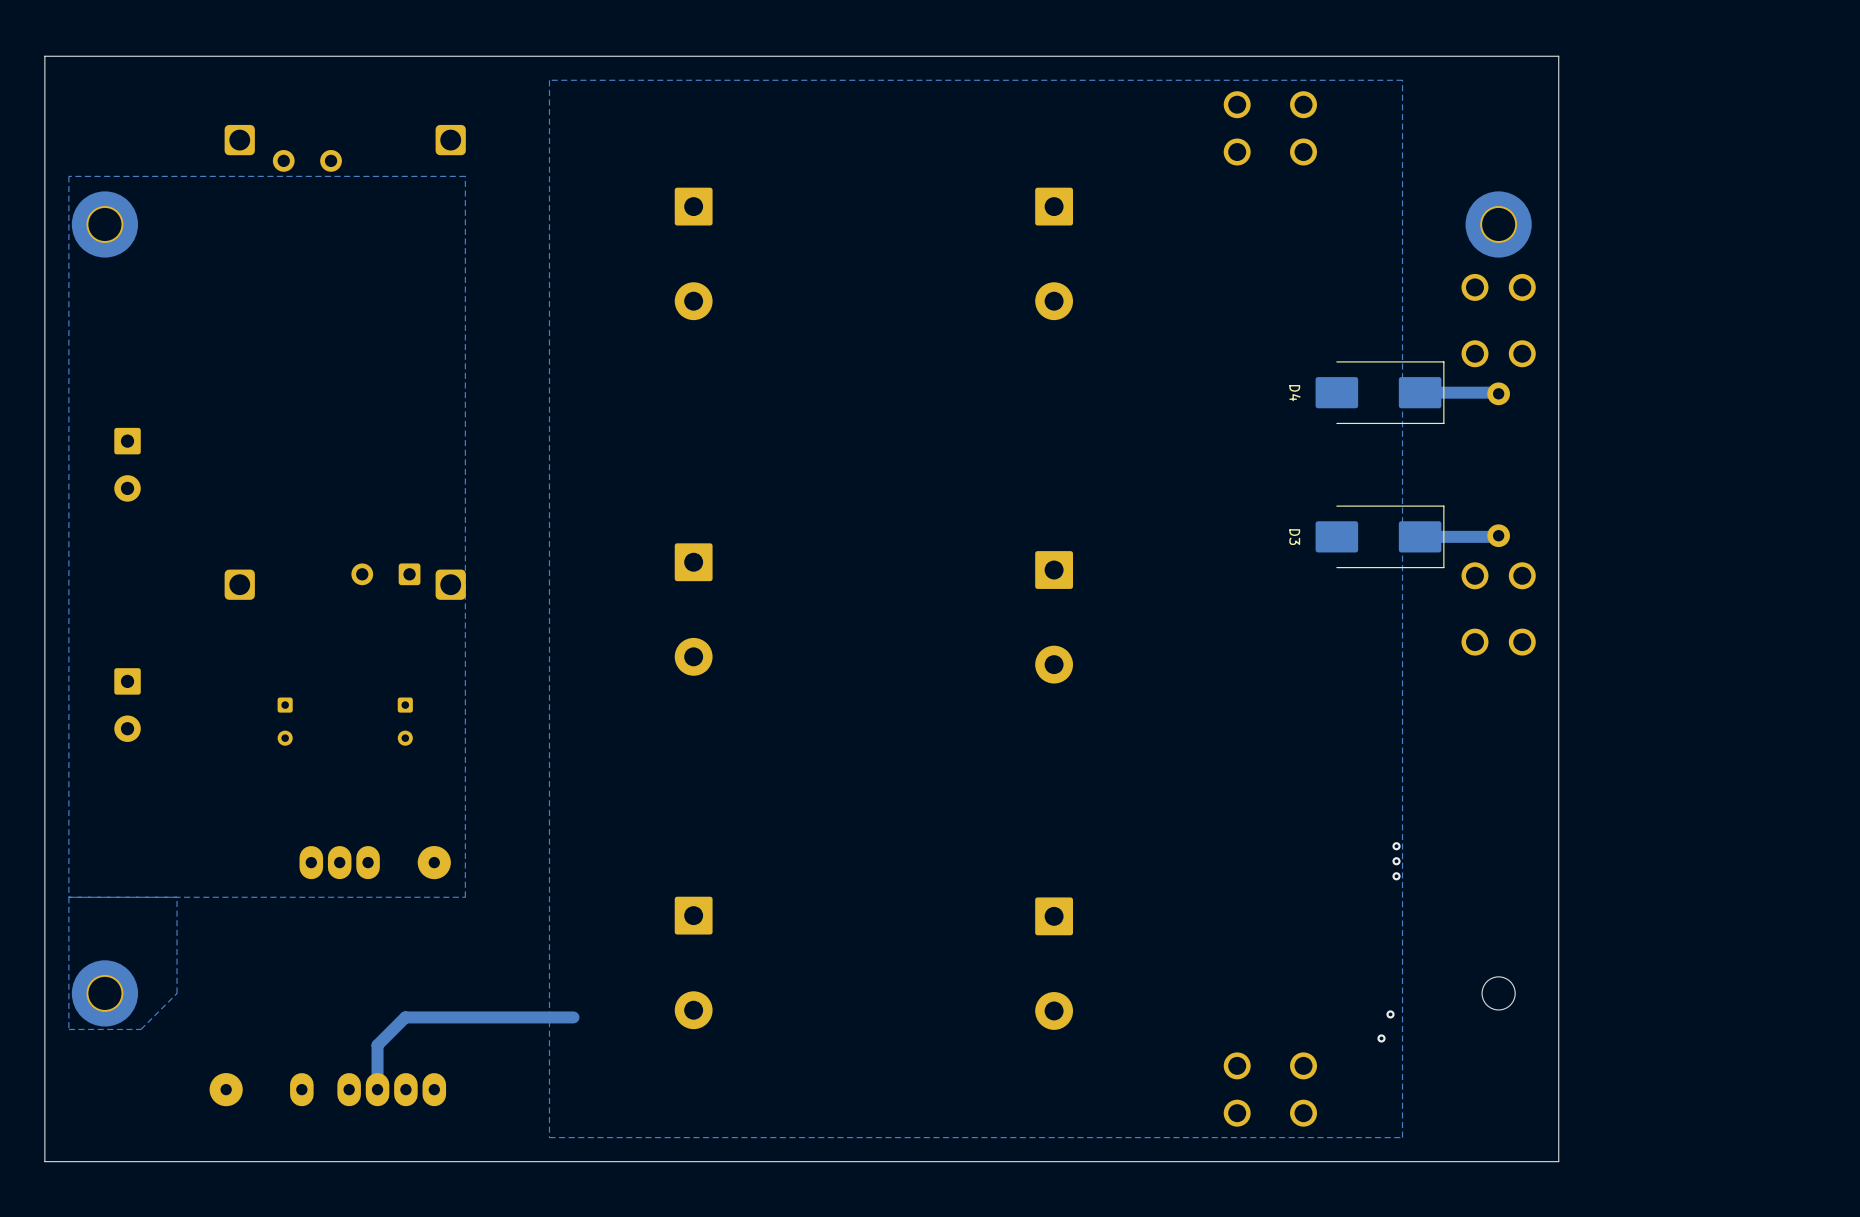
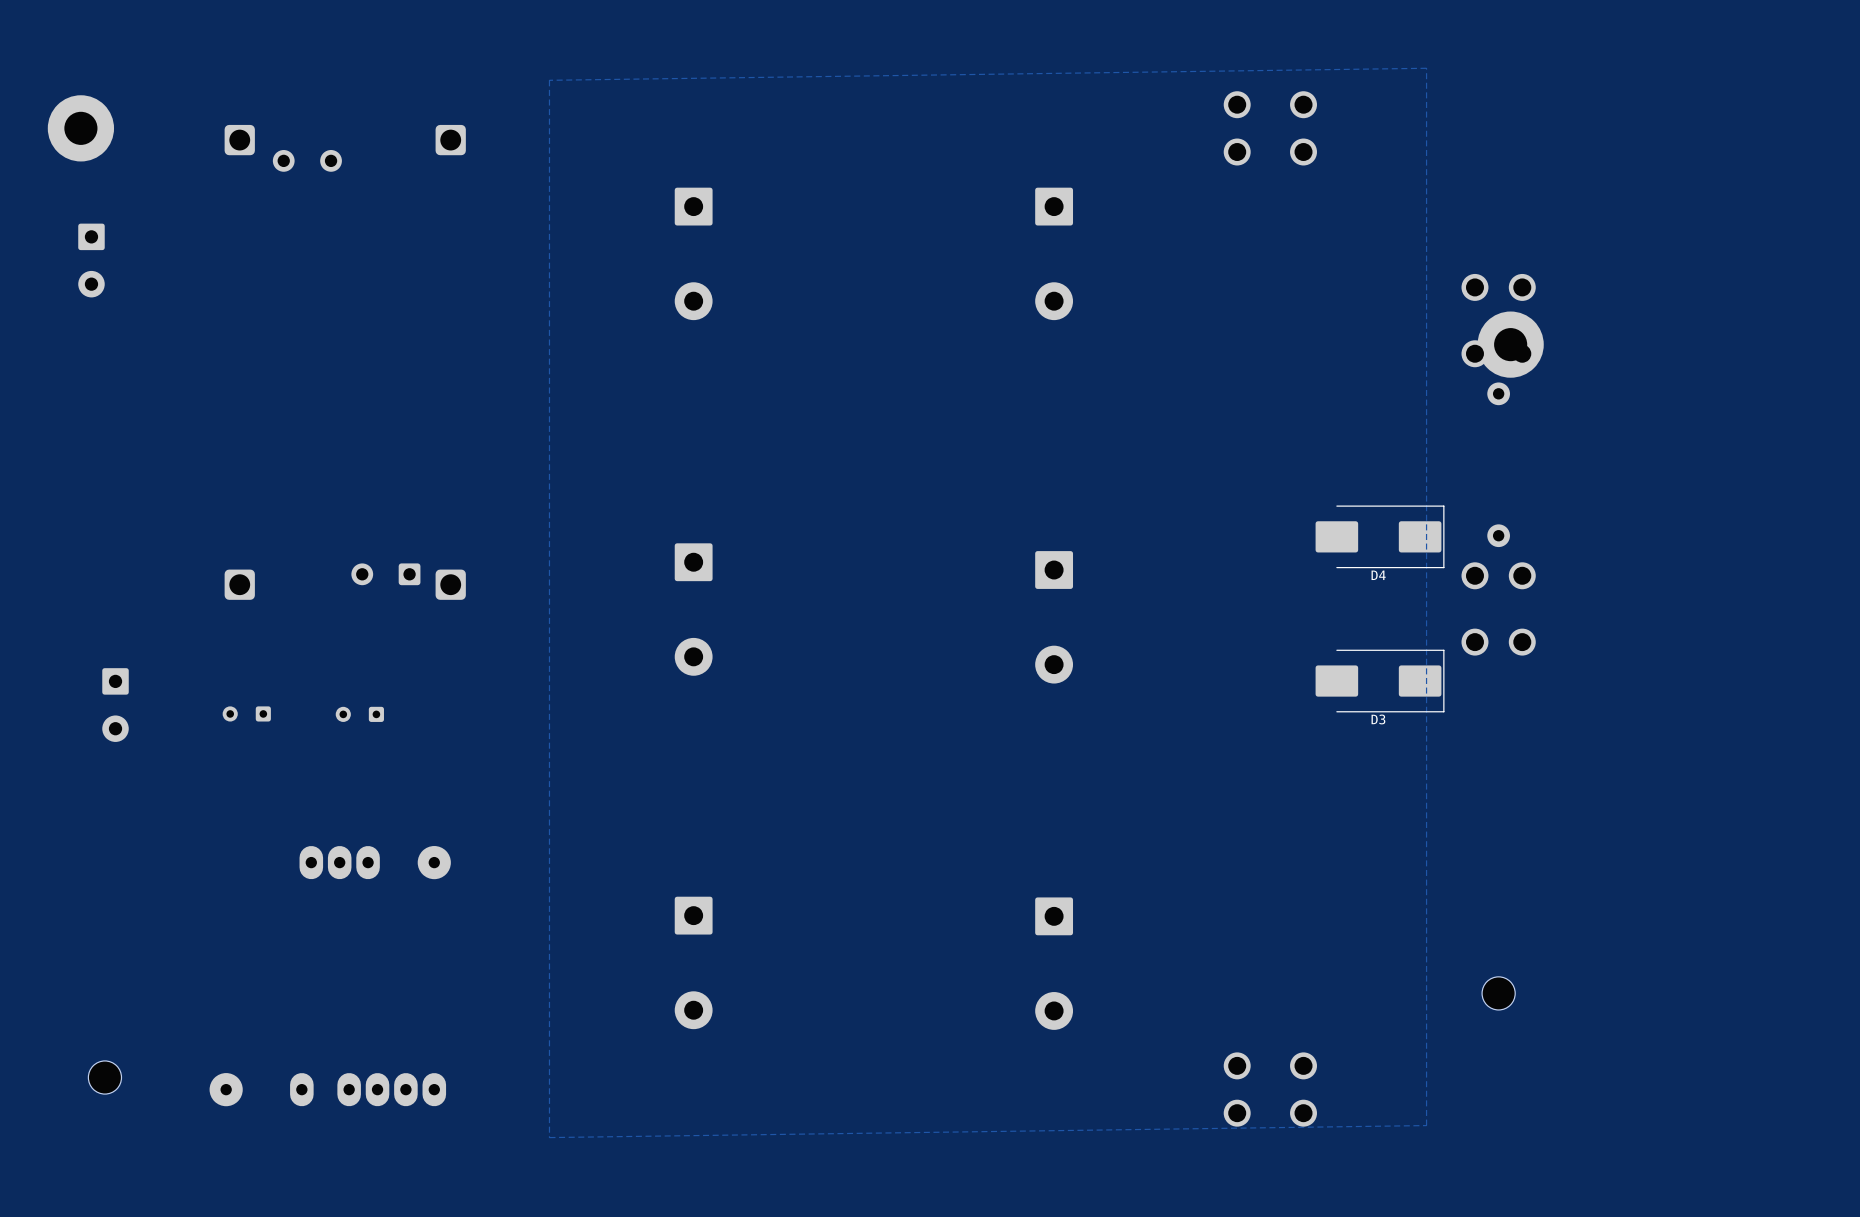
board edge: (1558, 56) (44, 56) (44, 1161) (1558, 1161) (1558, 56) -> none
zone outline: (549, 80) (1402, 80) (1402, 1137) (549, 1137) -> (549, 80) (1426, 68) (1426, 1125) (549, 1137)
part position: (104, 224) -> (80, 128)
part position: (1498, 224) -> (1510, 344)
part: none -> (91, 260)
D4: (1380, 392) -> none
track: (1420, 392) (1498, 393) -> none
part: (127, 464) -> none
track: (1498, 535) (1420, 536) -> none
D3 name: D3 (1294, 537) -> D4 (1378, 575)
D3: none -> (1380, 681)
part position: (127, 705) -> (115, 705)
part: none -> (246, 713)
part: none -> (359, 714)
part: (285, 721) -> none
part: (405, 721) -> none
via: (1396, 846) -> none
via: (1396, 861) -> none
via: (1396, 876) -> none
zone outline: (177, 897) (177, 993) (140, 1029) (68, 1029) (68, 176) (465, 176) (465, 897) (68, 897) -> none
part: (104, 993) -> none
via: (1390, 1014) -> none
track: (573, 1017) (405, 1017) (377, 1045) (377, 1089) -> none
via: (1381, 1038) -> none
part: none -> (104, 1077)

